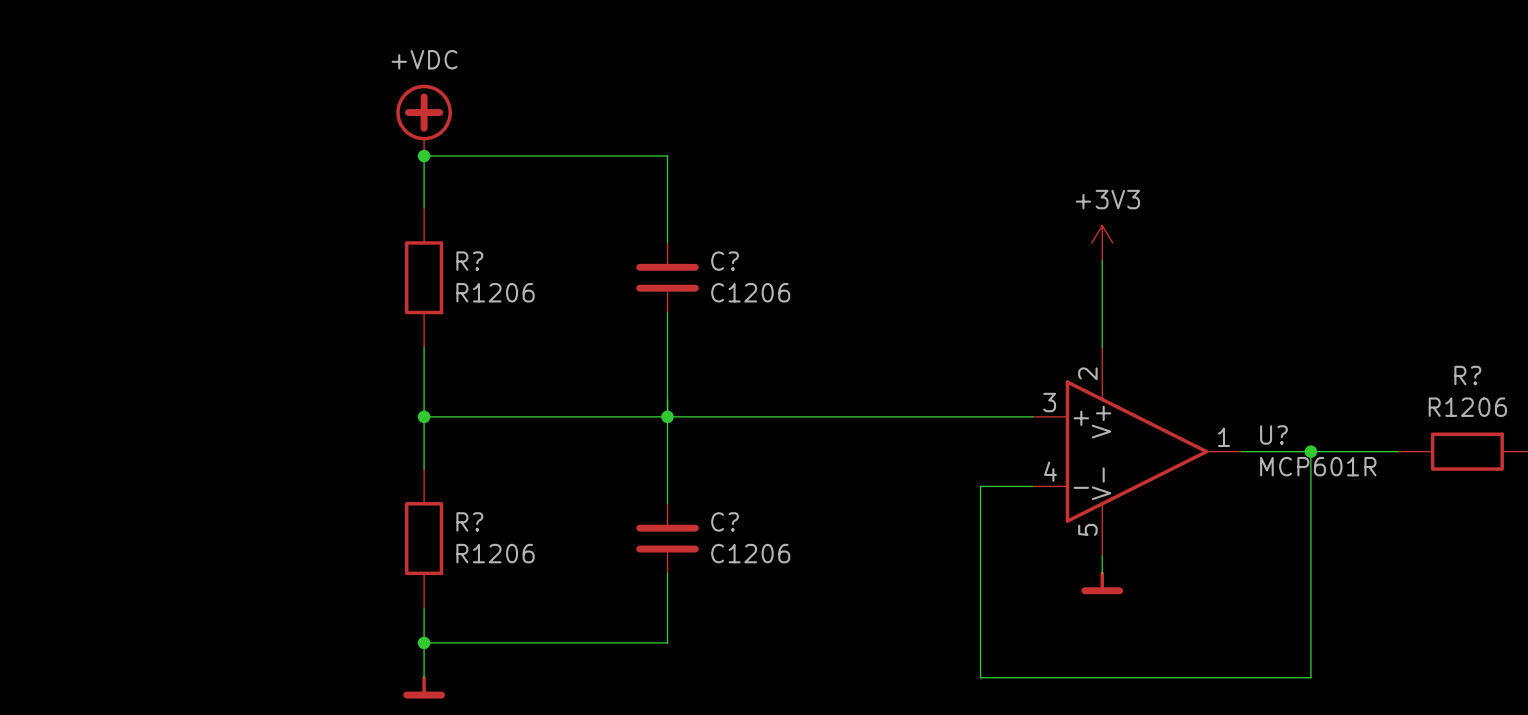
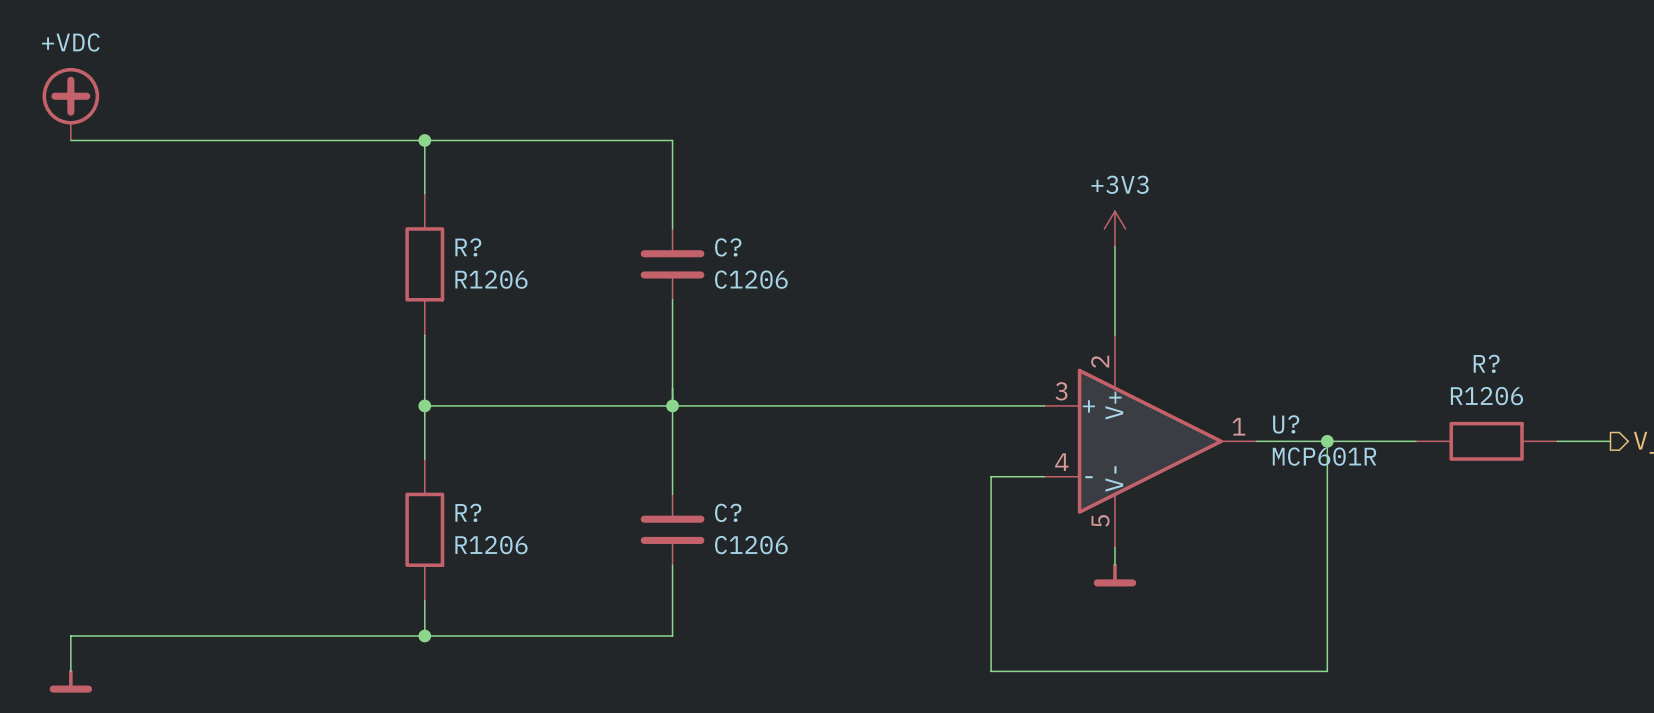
power symbol: none -> +VDC (70, 104)
power symbol: +VDC (424, 120) -> none
wire: none -> (70, 140) (424, 140)
wire: (424, 642) (424, 677) -> (424, 636) (70, 636) (70, 671)
power symbol: none -> (70, 681)
power symbol: (424, 687) -> none

